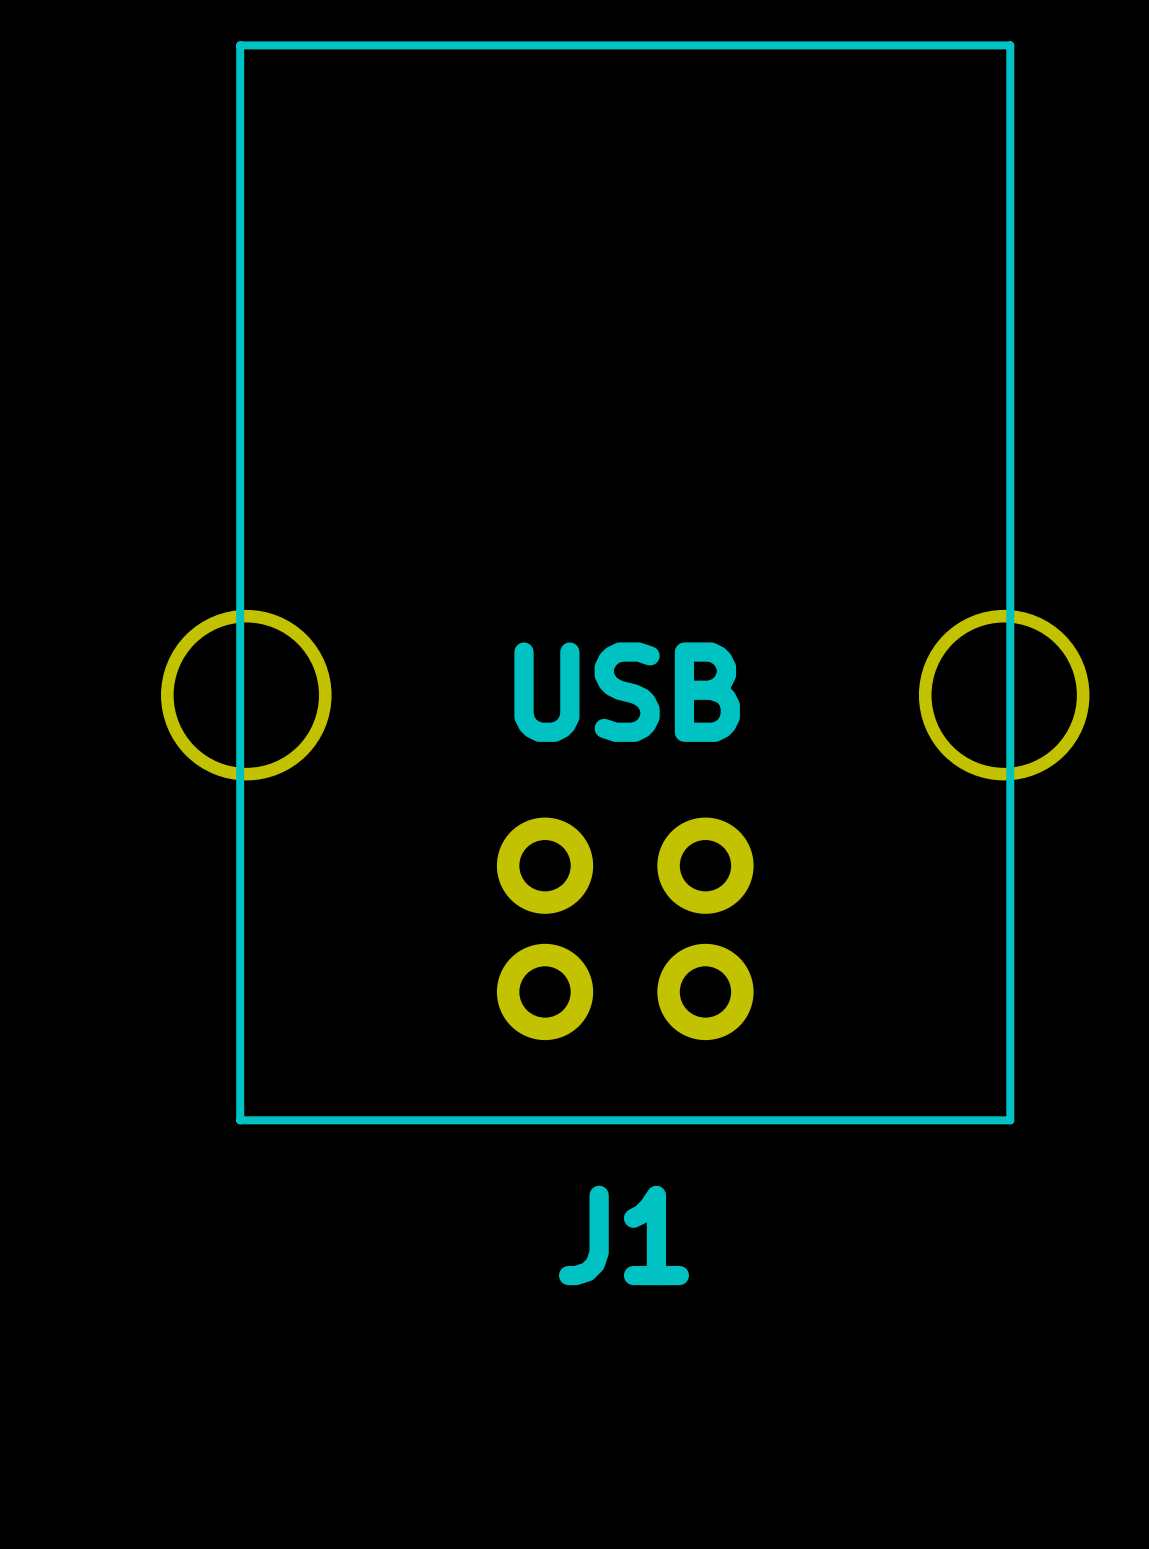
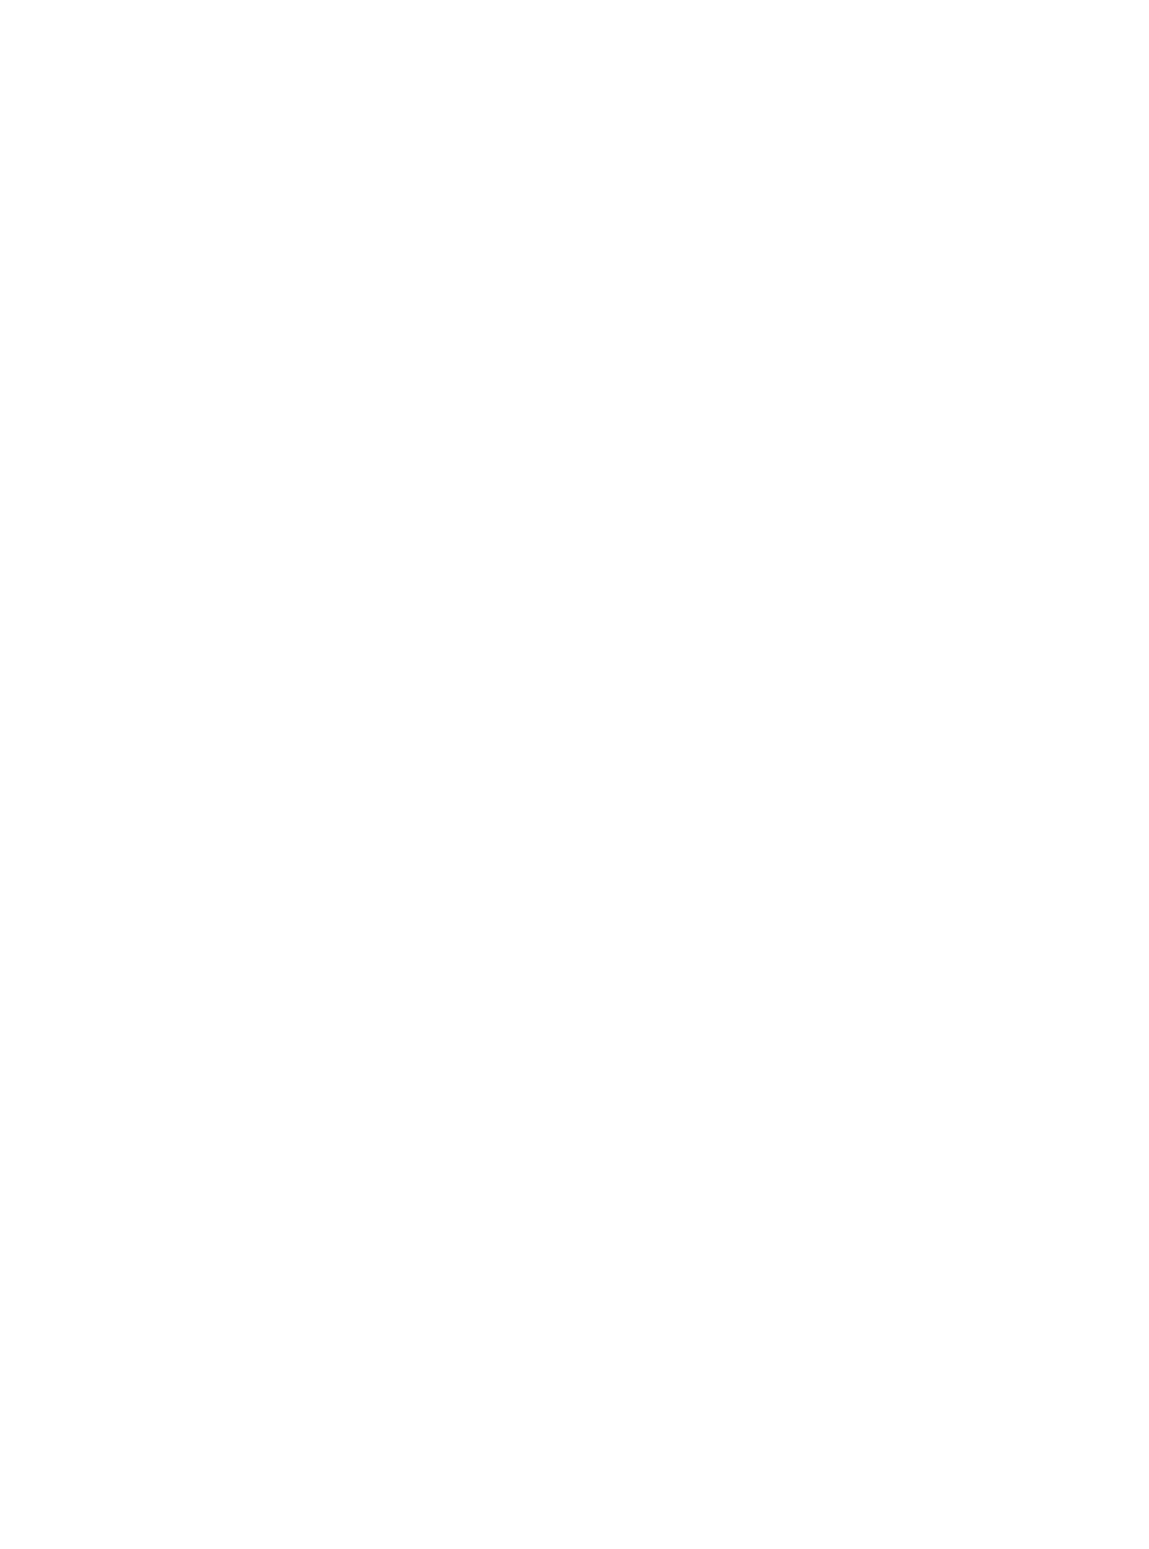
J1: USB (625, 582) -> none

